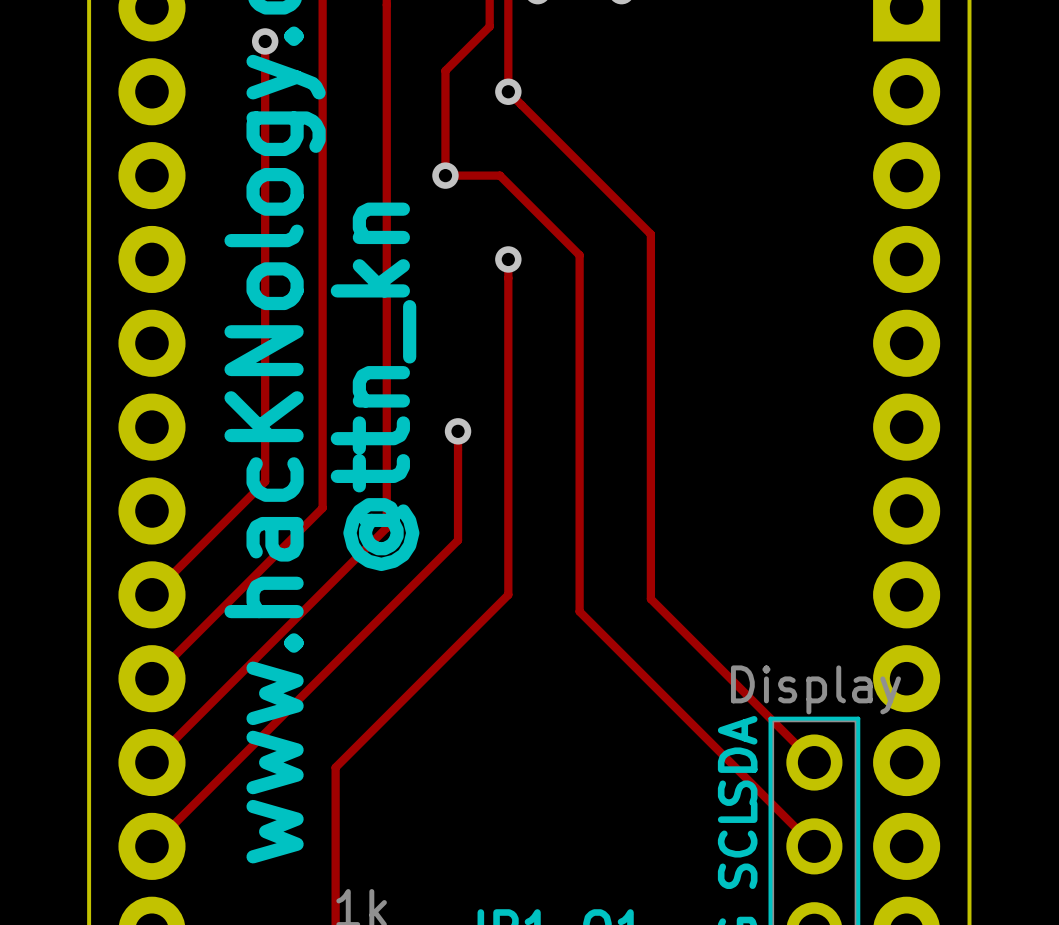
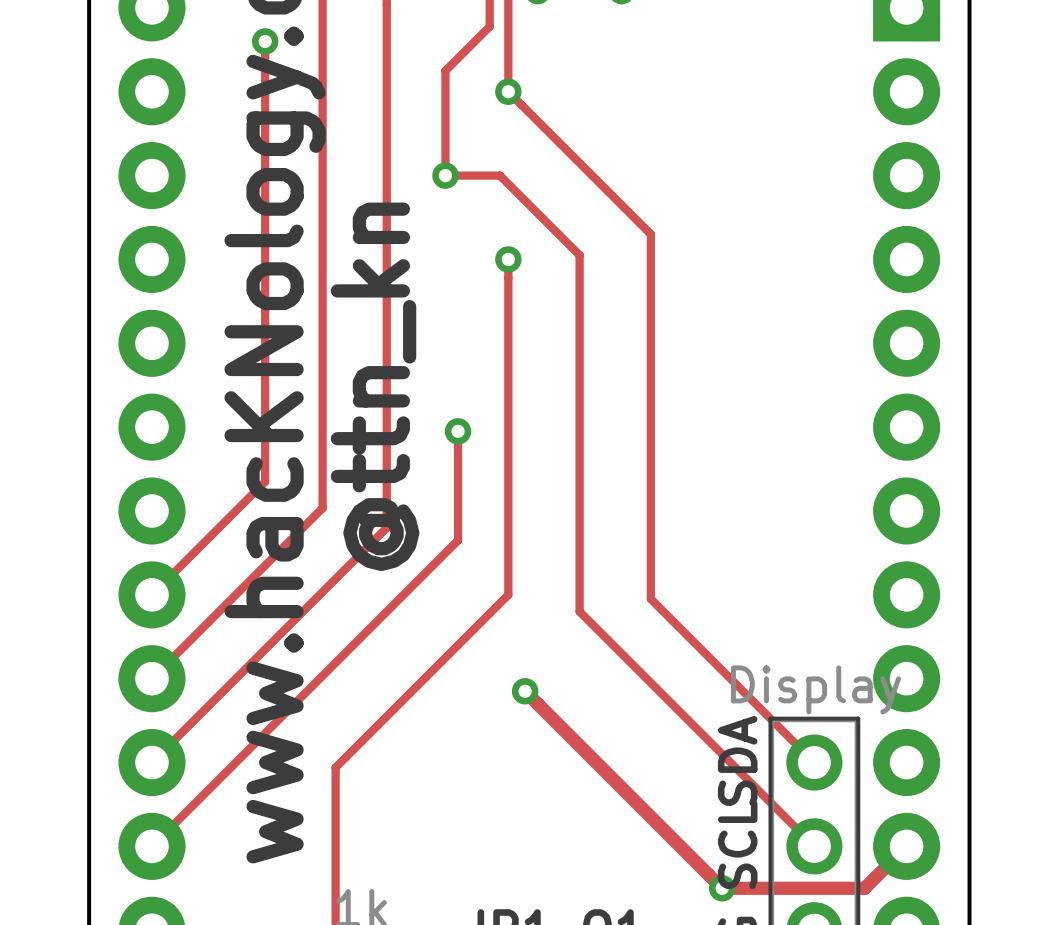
track: none -> (525, 691) (722, 888) (864, 888) (906, 846)
via: none -> (525, 691)
via: none -> (722, 888)

